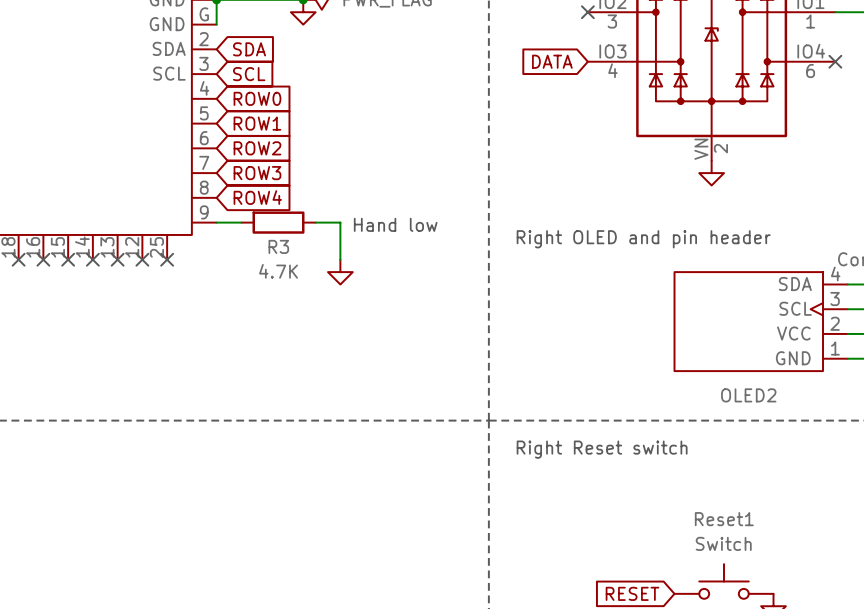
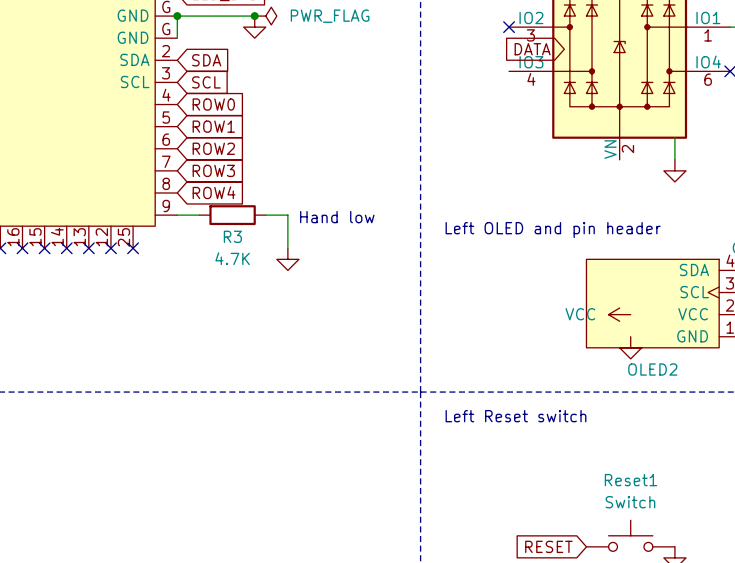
global label position: DATA (552, 61) -> DATA (532, 49)
wire: none -> (674, 137) (674, 159)
power symbol position: (711, 173) -> (674, 170)
text: Right OLED and pin header (643, 239) -> Left OLED and pin header (553, 230)
power symbol: none -> VCC (619, 314)
power symbol: none -> (630, 347)
text: Right Reset switch (602, 449) -> Left Reset switch (515, 416)

